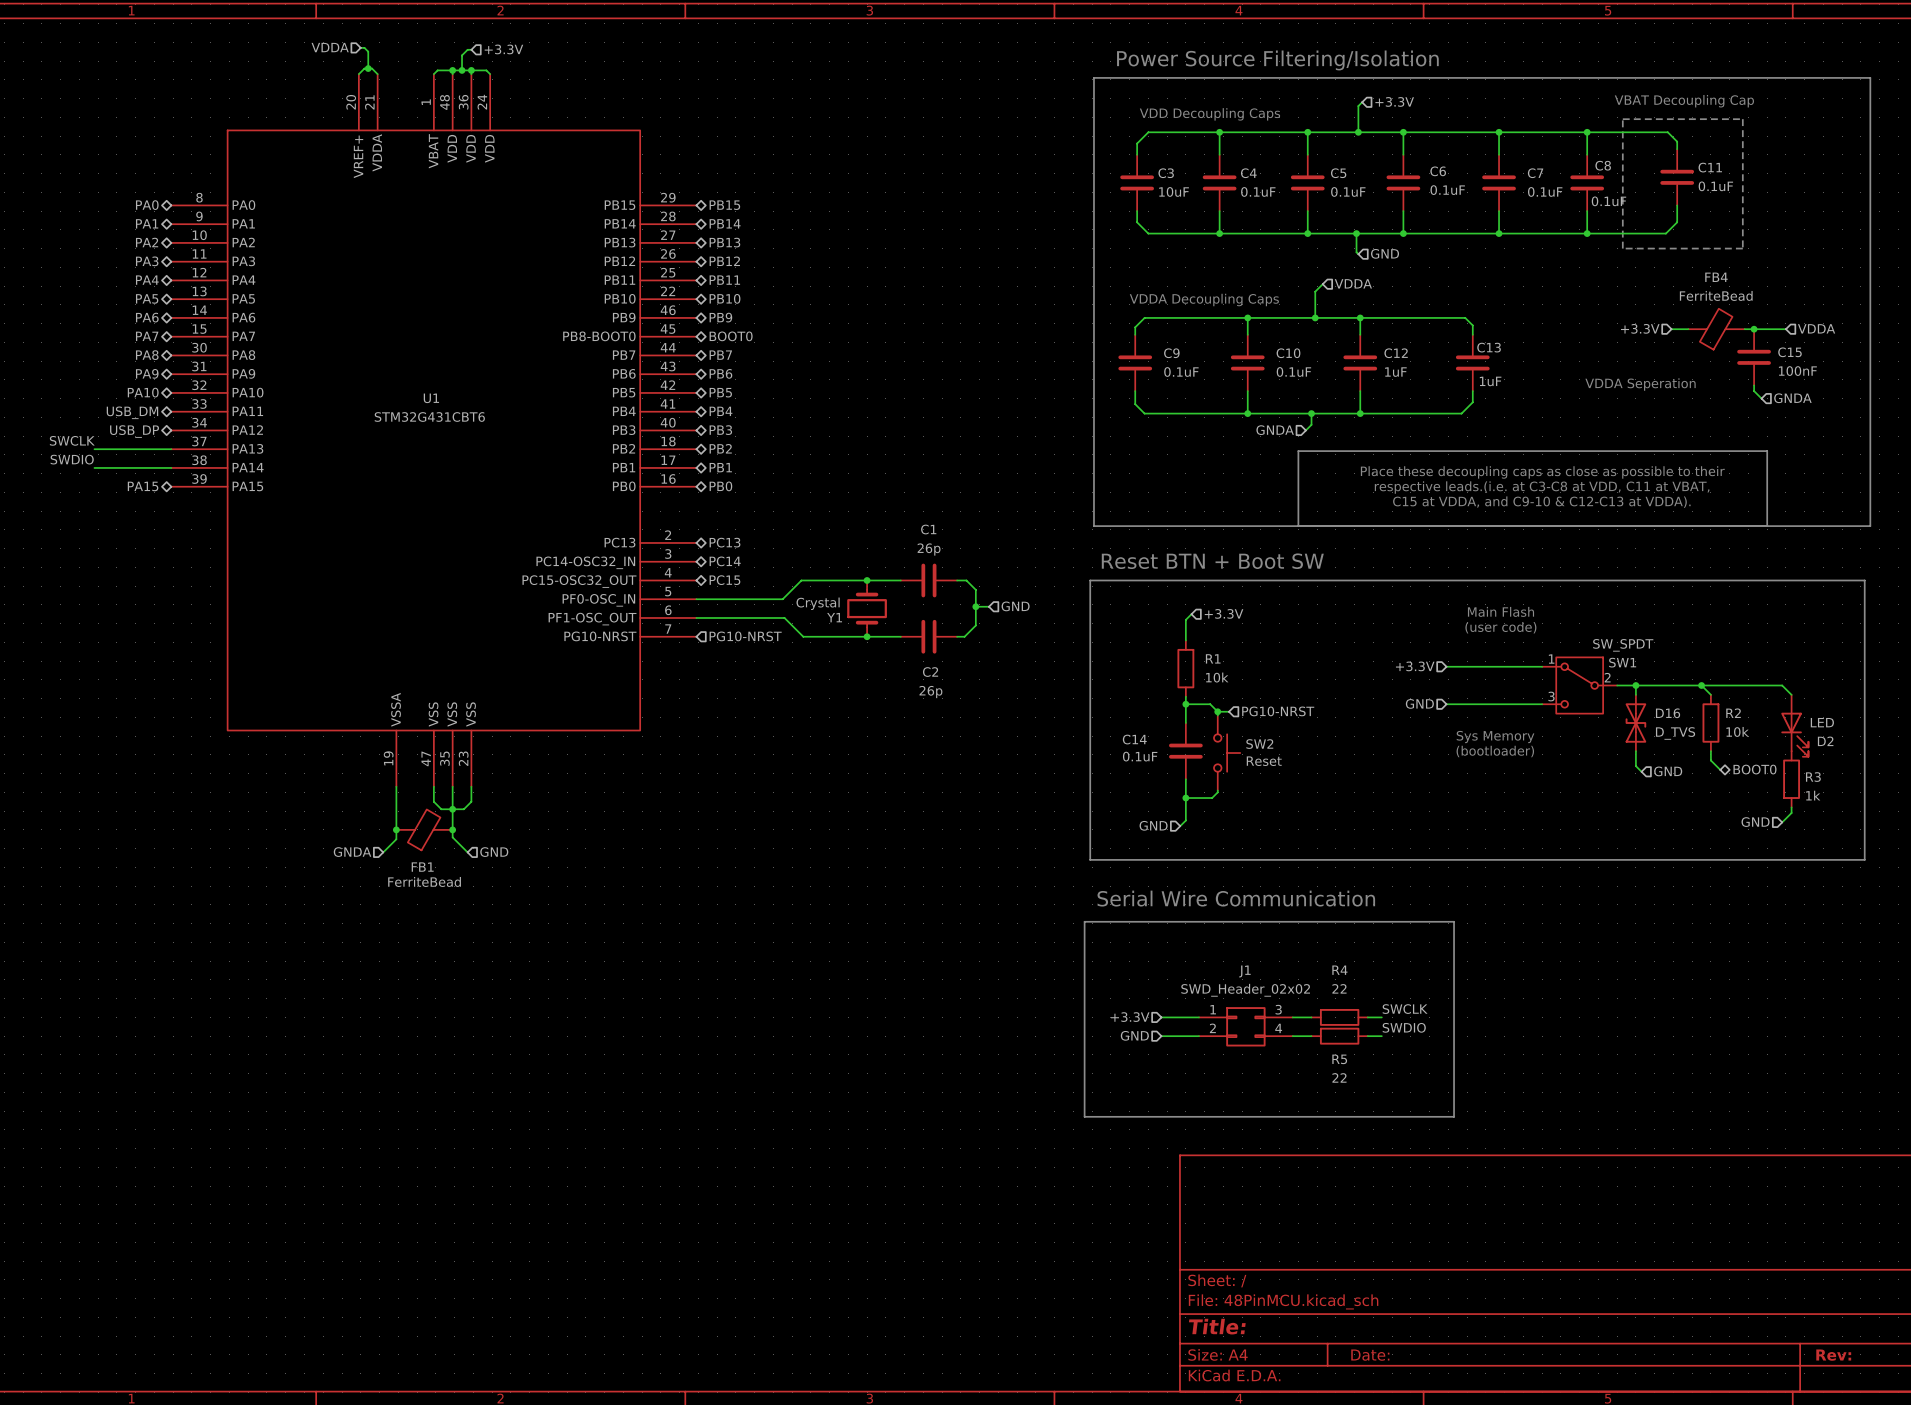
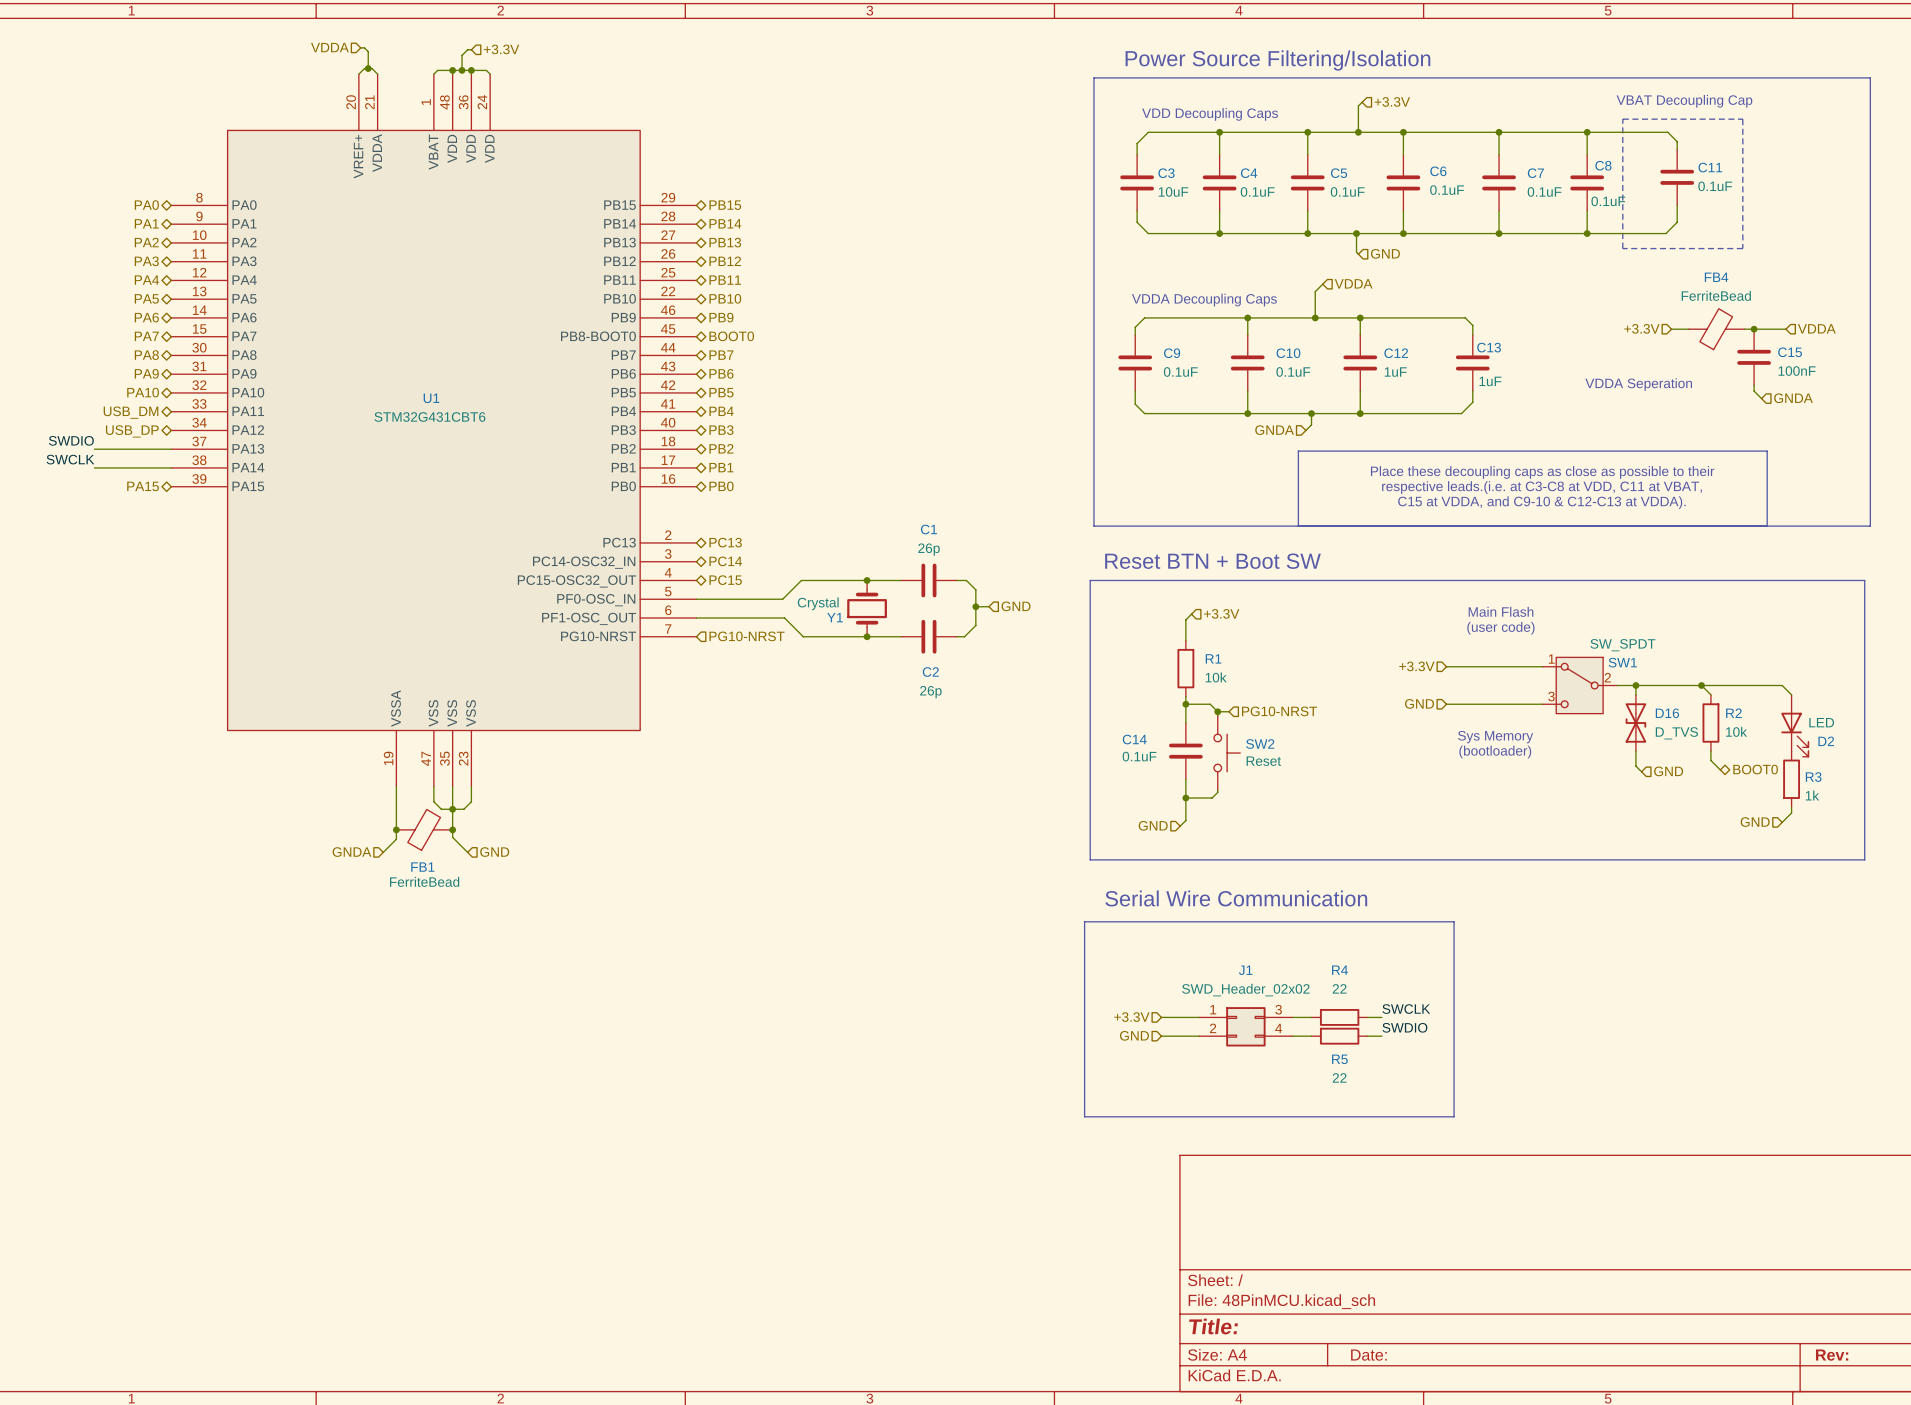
label: SWCLK (72, 440) -> SWDIO (71, 440)
label: SWDIO (72, 459) -> SWCLK (70, 459)

